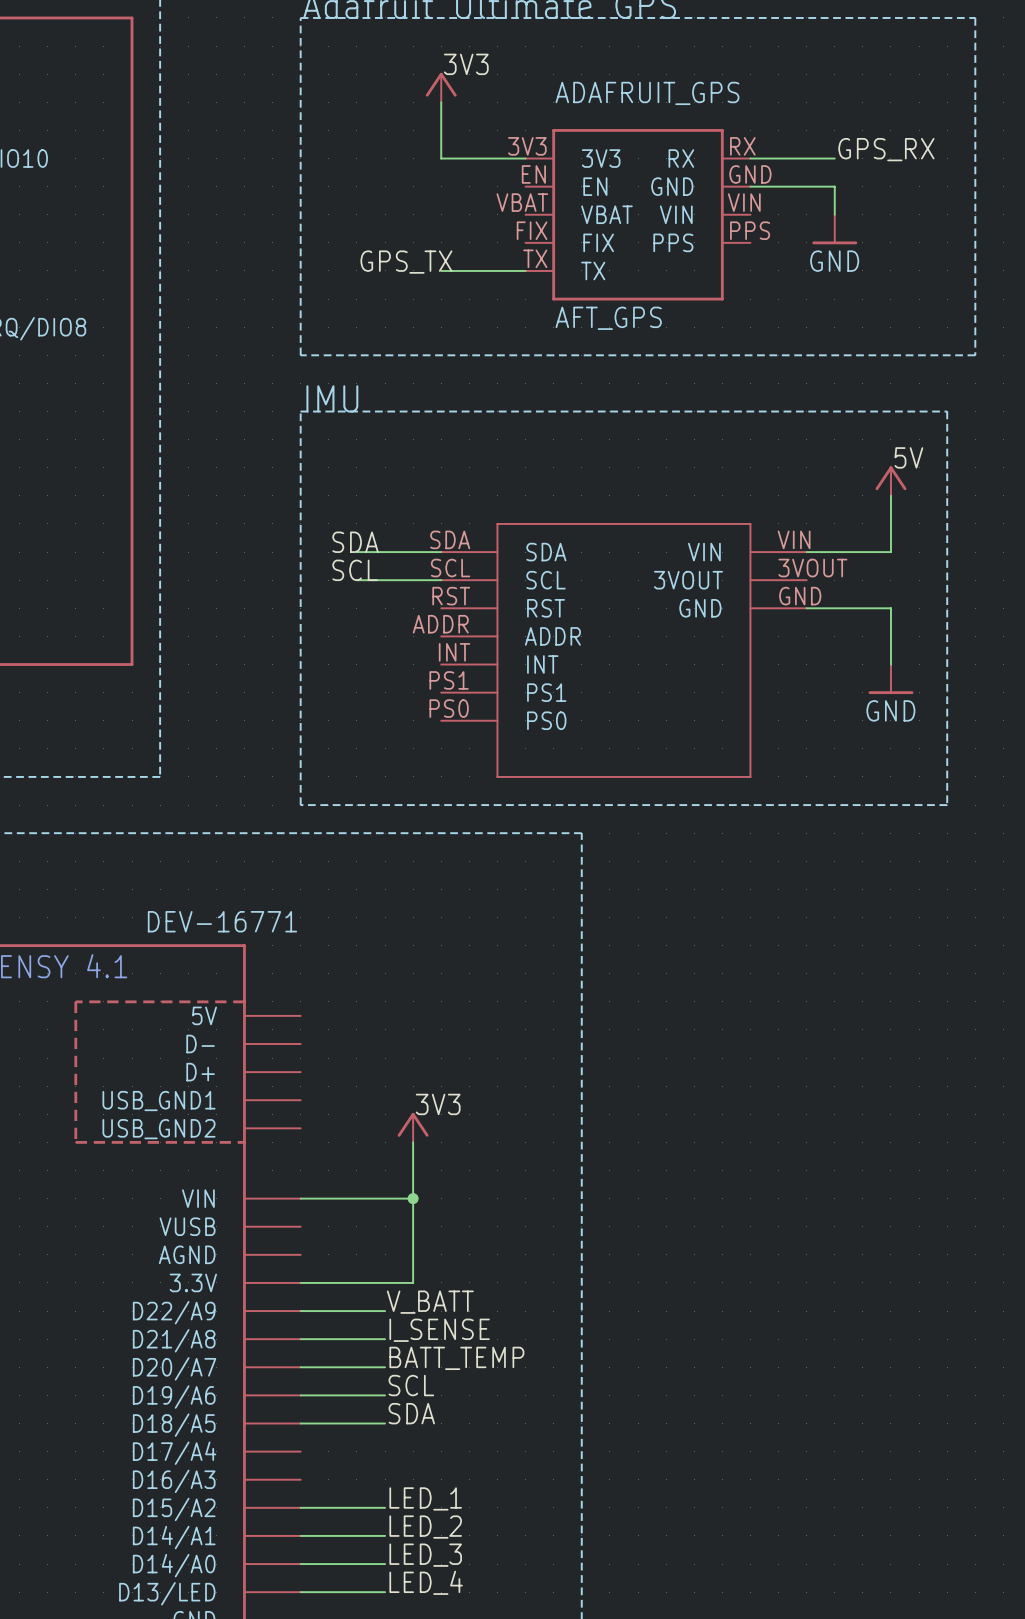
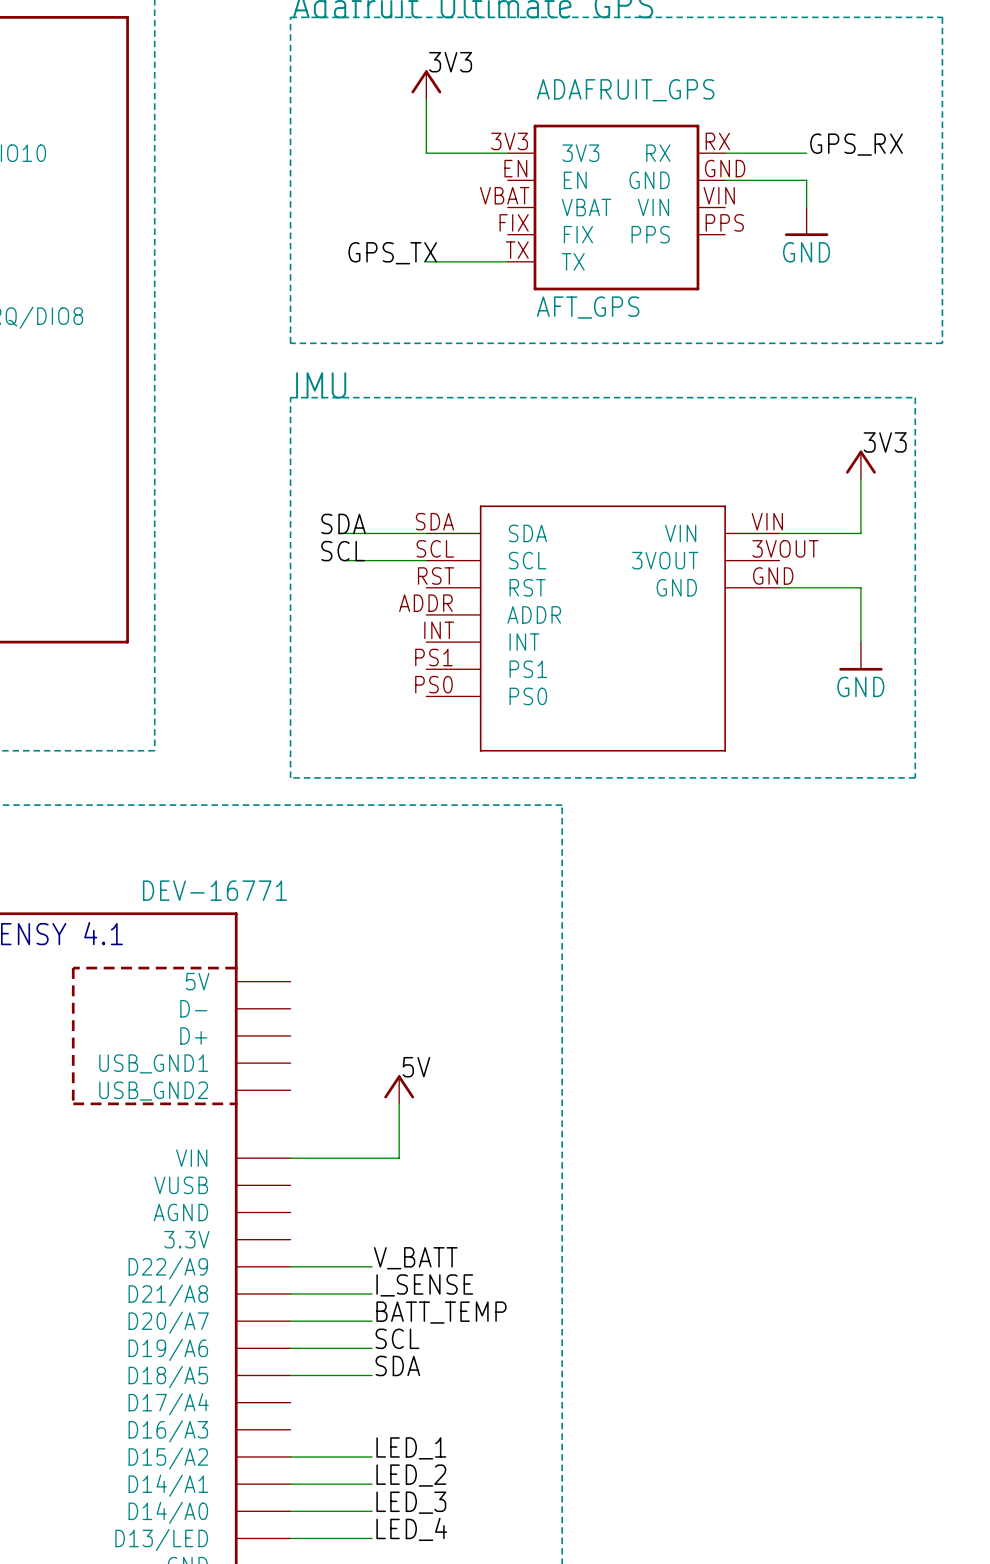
label: 5V (908, 457) -> 3V3 (885, 442)
label: 3V3 (438, 1104) -> 5V (416, 1067)
wire: (413, 1198) (413, 1282) (300, 1282) -> none
junction: (413, 1198) -> none

